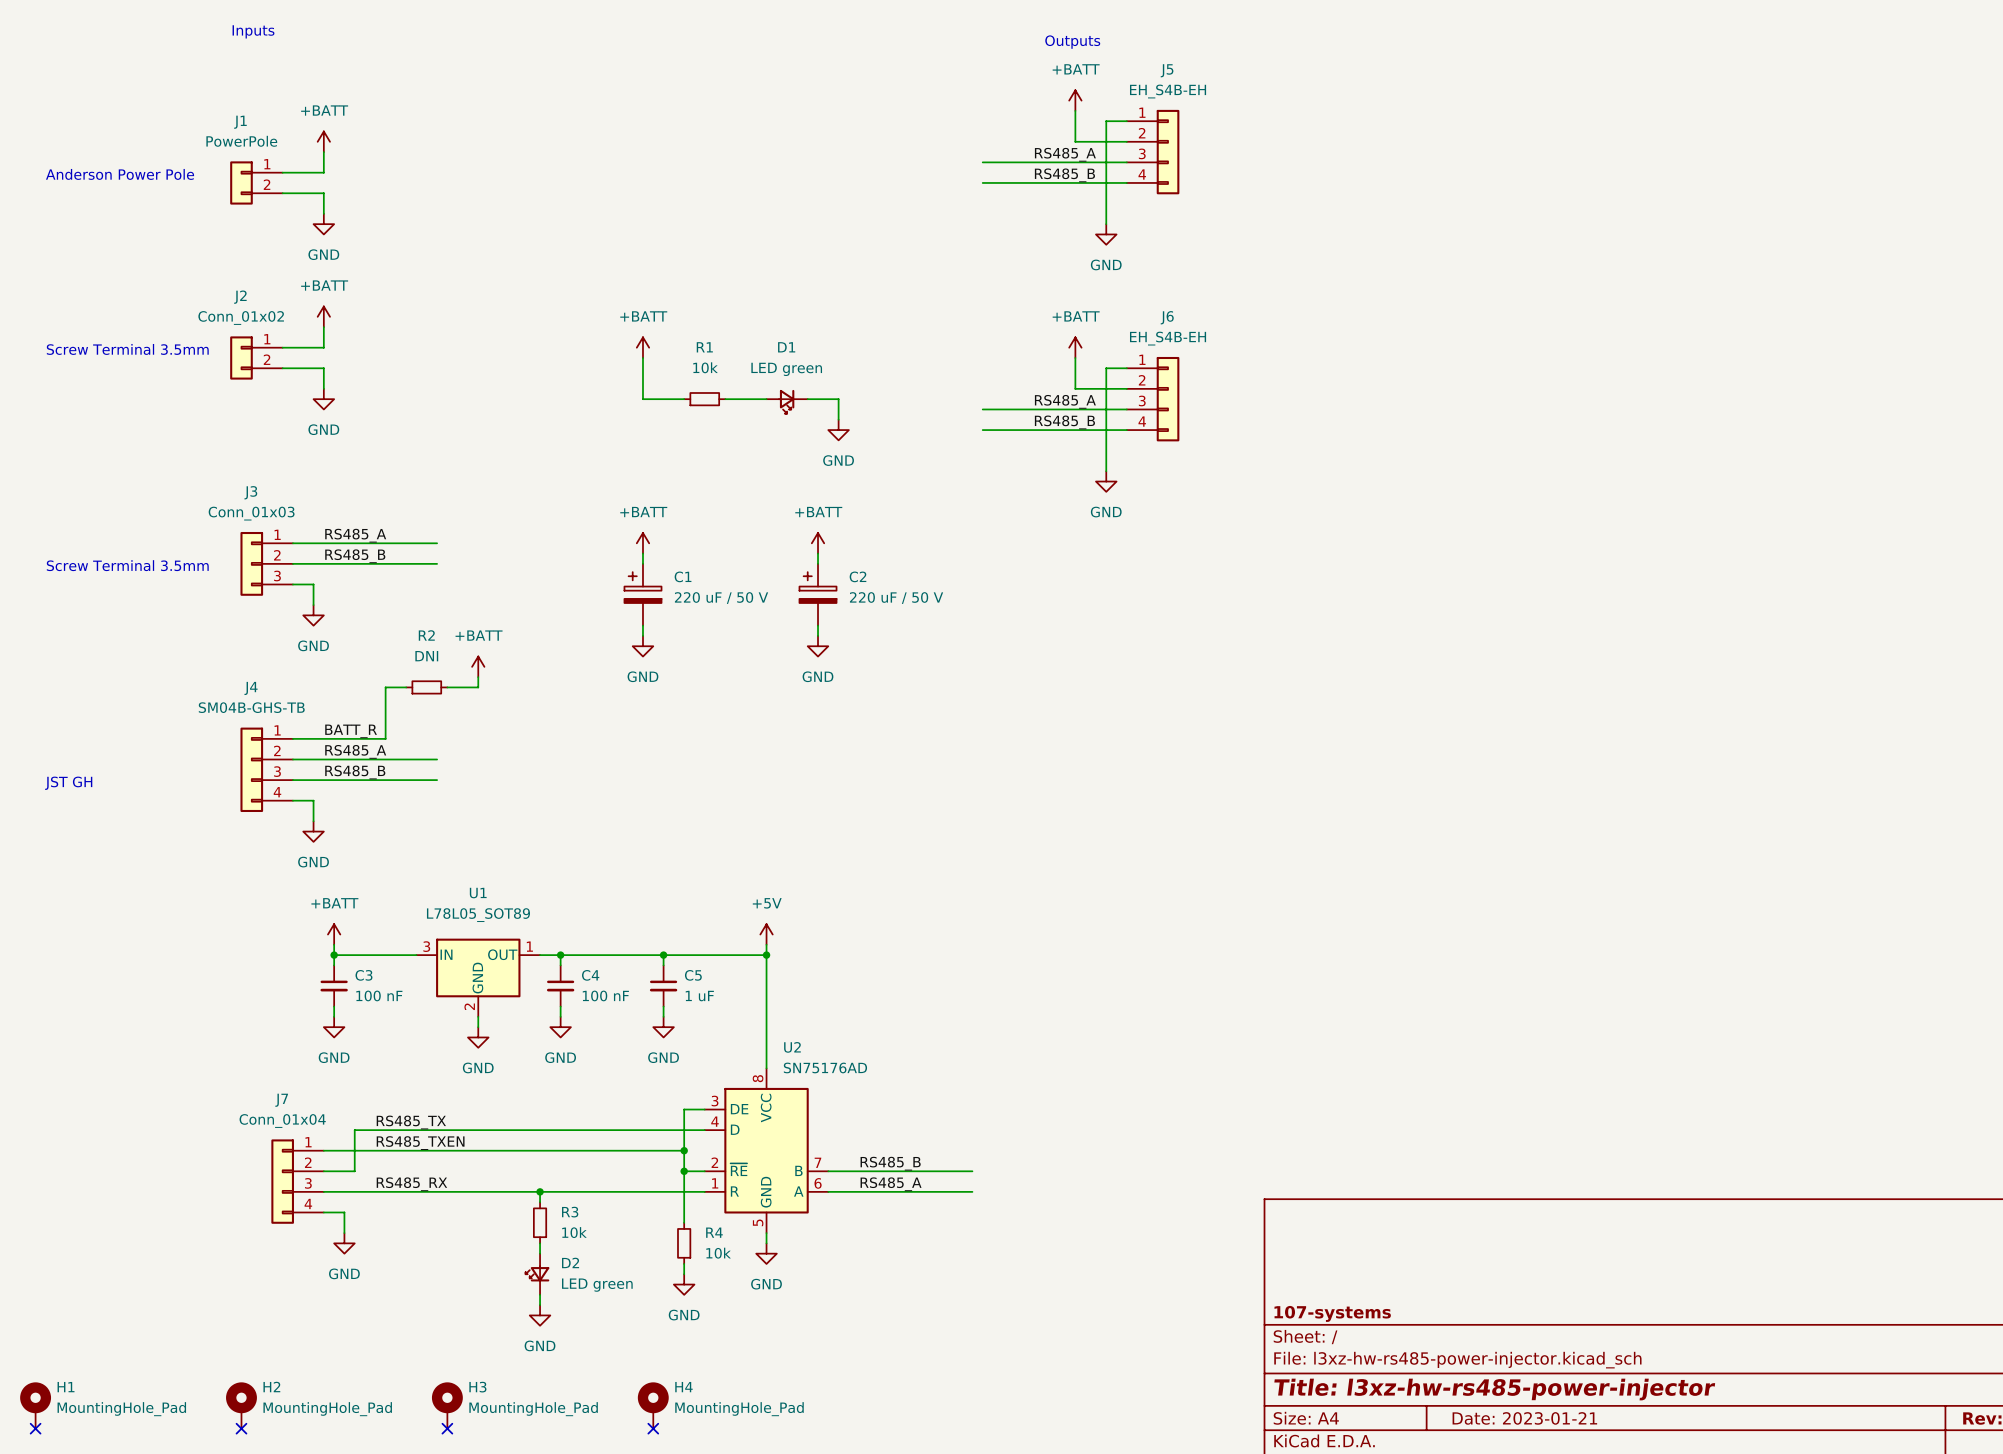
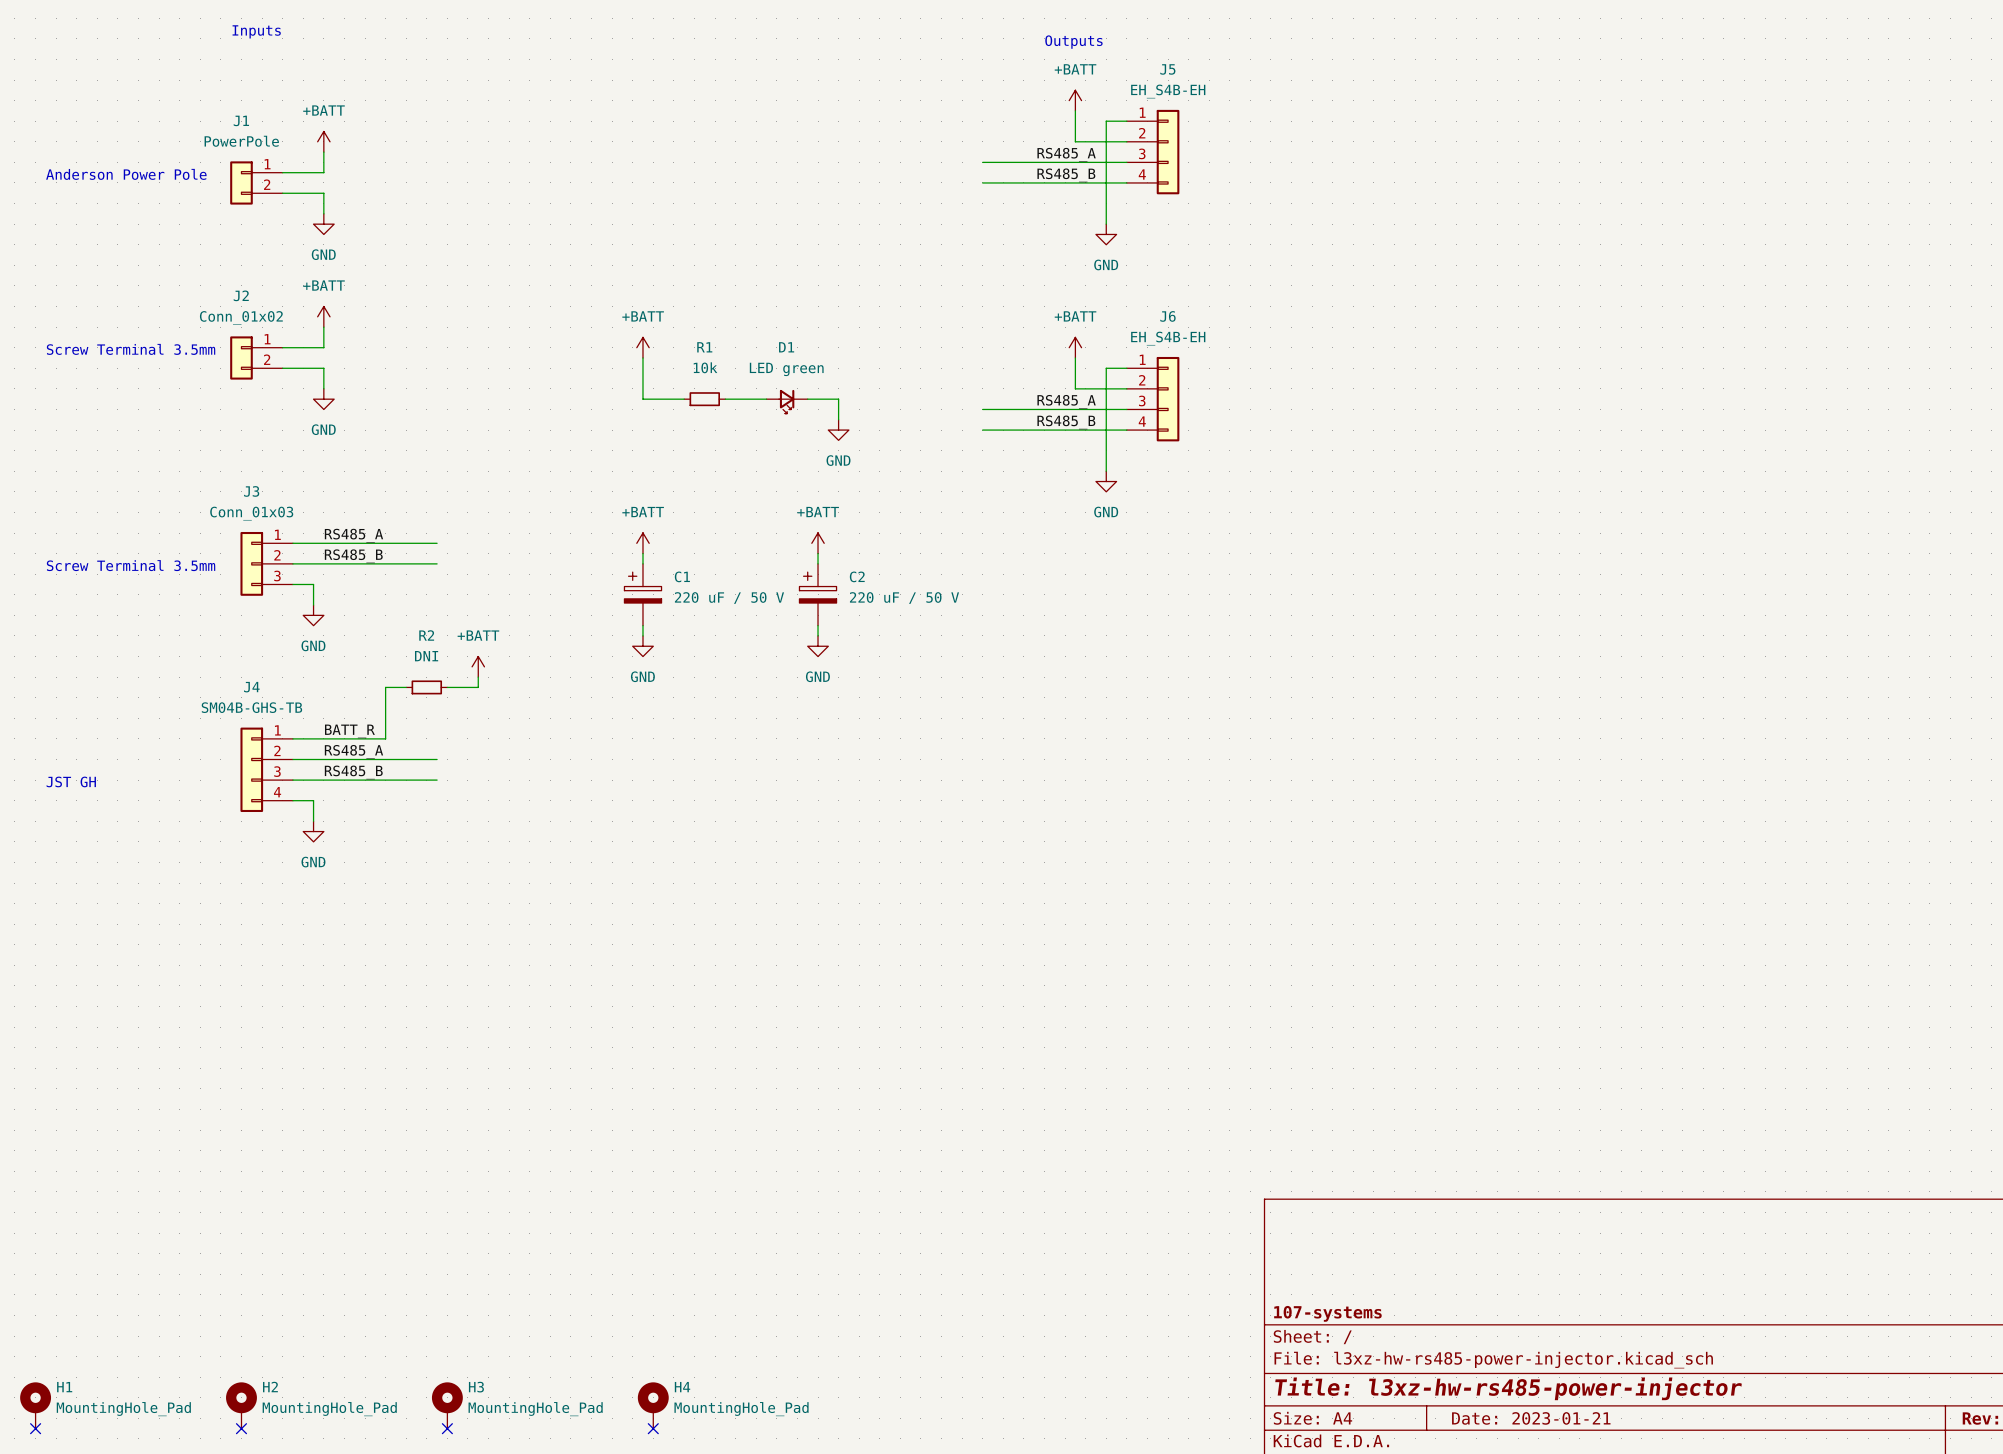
power symbol: +BATT (334, 934) -> none
power symbol: +5V (766, 934) -> none
wire: (334, 944) (334, 965) -> none
wire: (766, 944) (766, 1068) -> none
wire: (334, 955) (416, 955) -> none
junction: (334, 955) -> none
wire: (540, 955) (766, 955) -> none
wire: (560, 955) (560, 965) -> none
junction: (560, 955) -> none
wire: (663, 955) (663, 965) -> none
junction: (663, 955) -> none
junction: (766, 955) -> none
U1: L78L05_SOT89 (478, 977) -> none
C3: 100 nF (334, 985) -> none
C4: 100 nF (560, 985) -> none
C5: 1 uF (663, 985) -> none
wire: (334, 1006) (334, 1016) -> none
wire: (560, 1006) (560, 1016) -> none
wire: (663, 1006) (663, 1016) -> none
wire: (478, 1016) (478, 1027) -> none
power symbol: GND (334, 1027) -> none
power symbol: GND (560, 1027) -> none
power symbol: GND (663, 1027) -> none
power symbol: GND (478, 1037) -> none
wire: (704, 1109) (684, 1109) (684, 1222) -> none
label: RS485_TX (411, 1122) -> none
wire: (704, 1130) (354, 1130) (354, 1171) (323, 1171) -> none
label: RS485_TXEN (420, 1143) -> none
wire: (323, 1150) (684, 1150) -> none
junction: (684, 1150) -> none
U2: SN75176AD (766, 1150) -> none
label: RS485_B (890, 1163) -> none
wire: (684, 1171) (704, 1171) -> none
junction: (684, 1171) -> none
wire: (828, 1171) (972, 1171) -> none
J7: Conn_01x04 (297, 1181) -> none
label: RS485_RX (411, 1184) -> none
label: RS485_A (891, 1184) -> none
wire: (323, 1191) (704, 1191) -> none
wire: (540, 1191) (540, 1202) -> none
junction: (540, 1191) -> none
wire: (828, 1191) (972, 1191) -> none
wire: (323, 1212) (344, 1212) (344, 1233) -> none
R3: 10k (540, 1222) -> none
wire: (766, 1233) (766, 1243) -> none
power symbol: GND (344, 1243) -> none
wire: (540, 1243) (540, 1253) -> none
R4: 10k (684, 1243) -> none
power symbol: GND (766, 1253) -> none
wire: (684, 1263) (684, 1274) -> none
D2: LED green (537, 1274) -> none
power symbol: GND (684, 1284) -> none
wire: (540, 1294) (540, 1305) -> none
power symbol: GND (540, 1315) -> none

